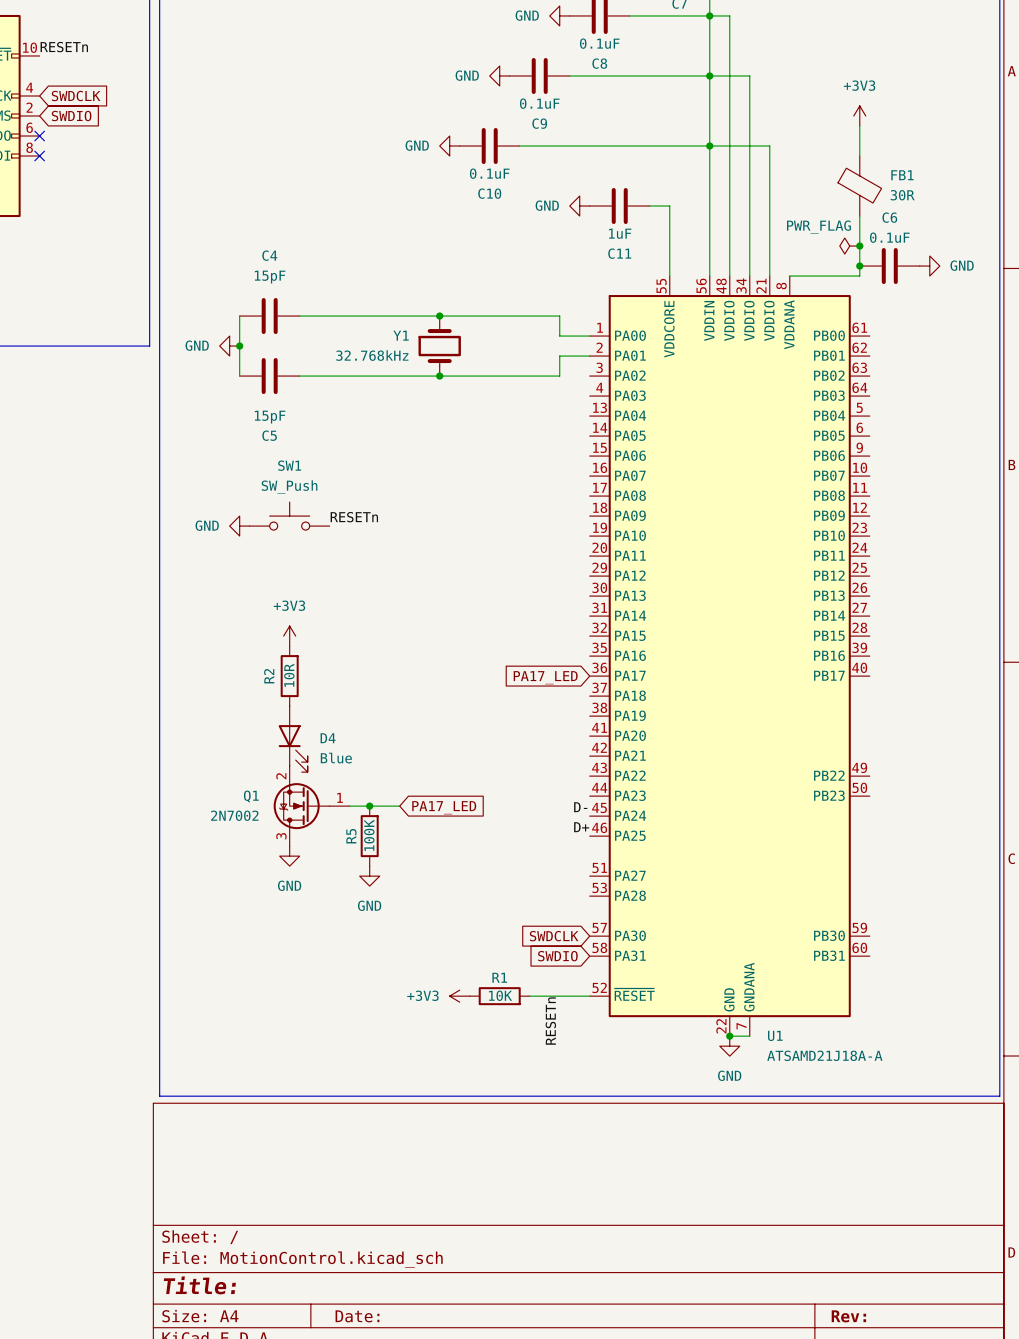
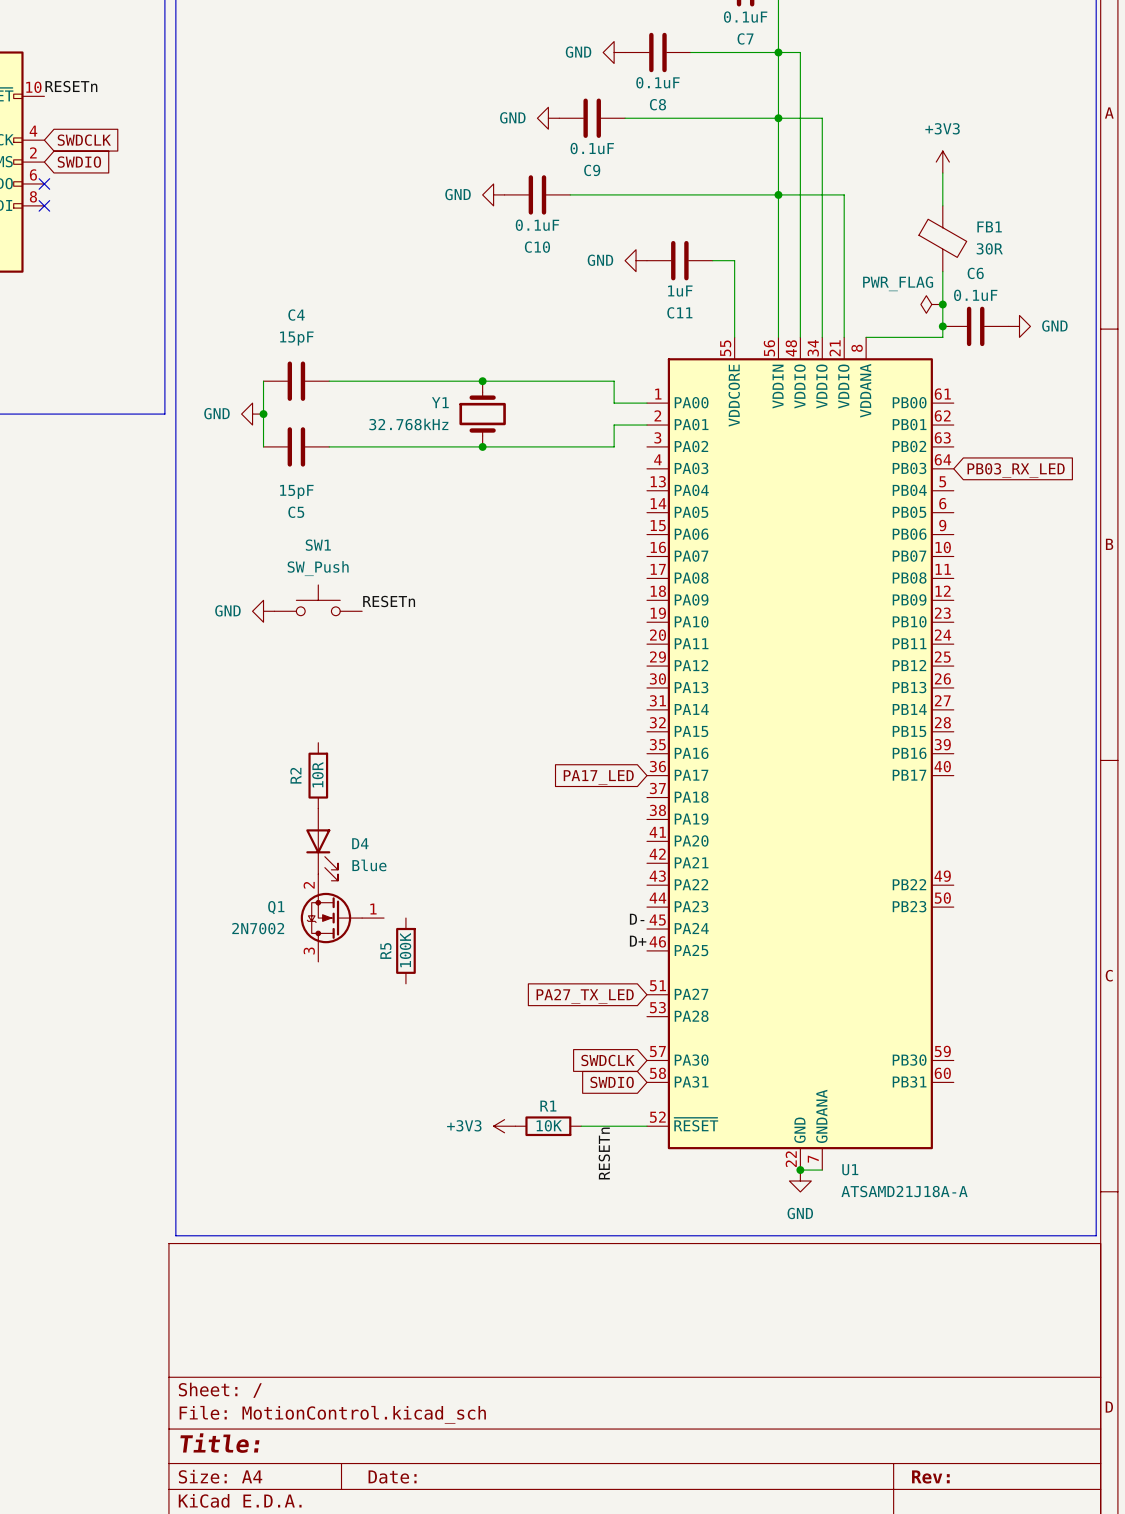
global label: none -> PB03_RX_LED (1016, 470)
power symbol: +3V3 (289, 636) -> none
wire: (349, 806) (399, 806) -> none
junction: (369, 806) -> none
global label: PA17_LED (444, 807) -> none
power symbol: GND (289, 856) -> none
power symbol: GND (369, 876) -> none
global label: none -> PA27_TX_LED (585, 996)

